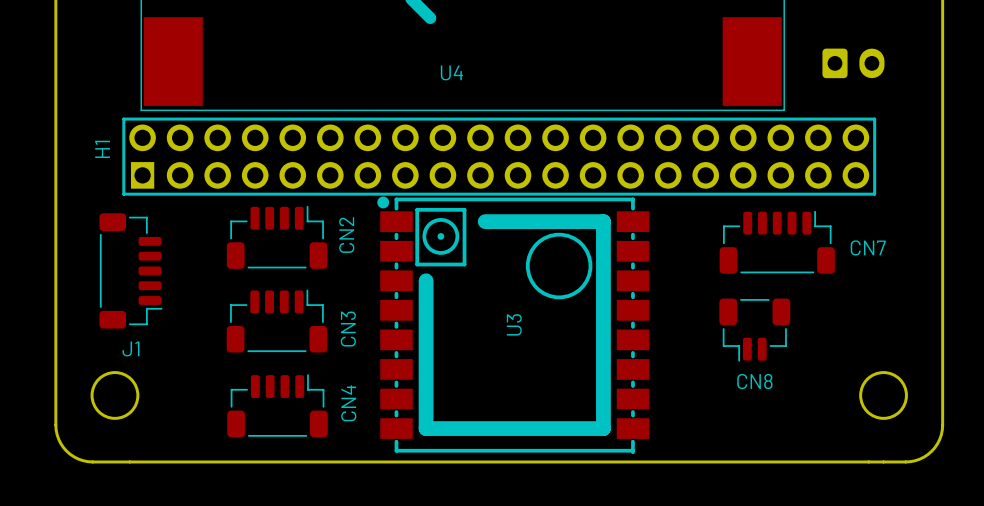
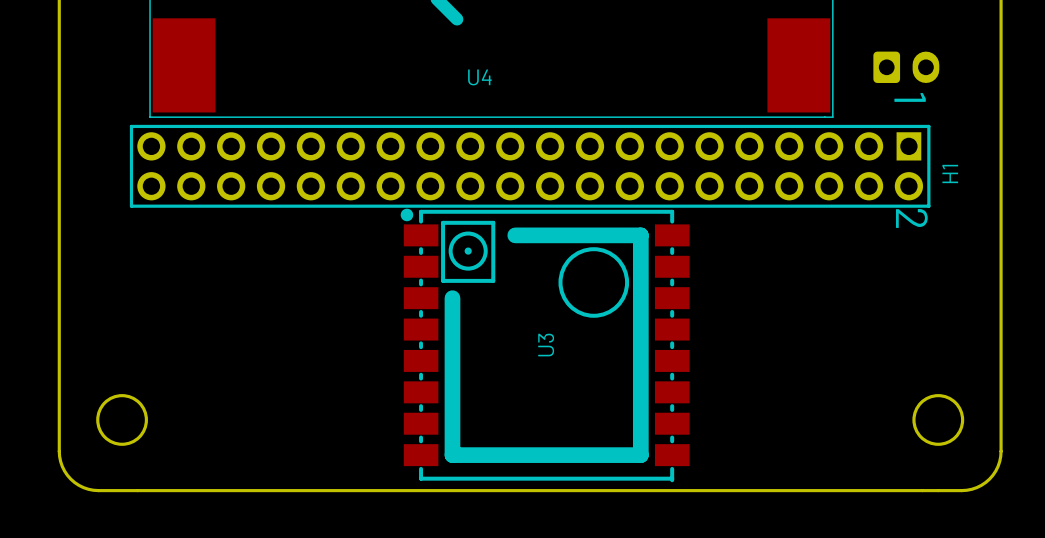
text: none -> 1 (910, 97)
H1 rotation: 0° (499, 156) -> 180° (530, 166)
text: none -> 2 (911, 218)
CN2: (277, 237) -> none
CN7: (777, 242) -> none
J1: (130, 270) -> none
CN3: (276, 321) -> none
CN8: (754, 330) -> none
CN4: (277, 405) -> none

